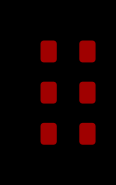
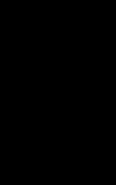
part: (68, 51) -> none
part: (68, 92) -> none
part: (68, 133) -> none

